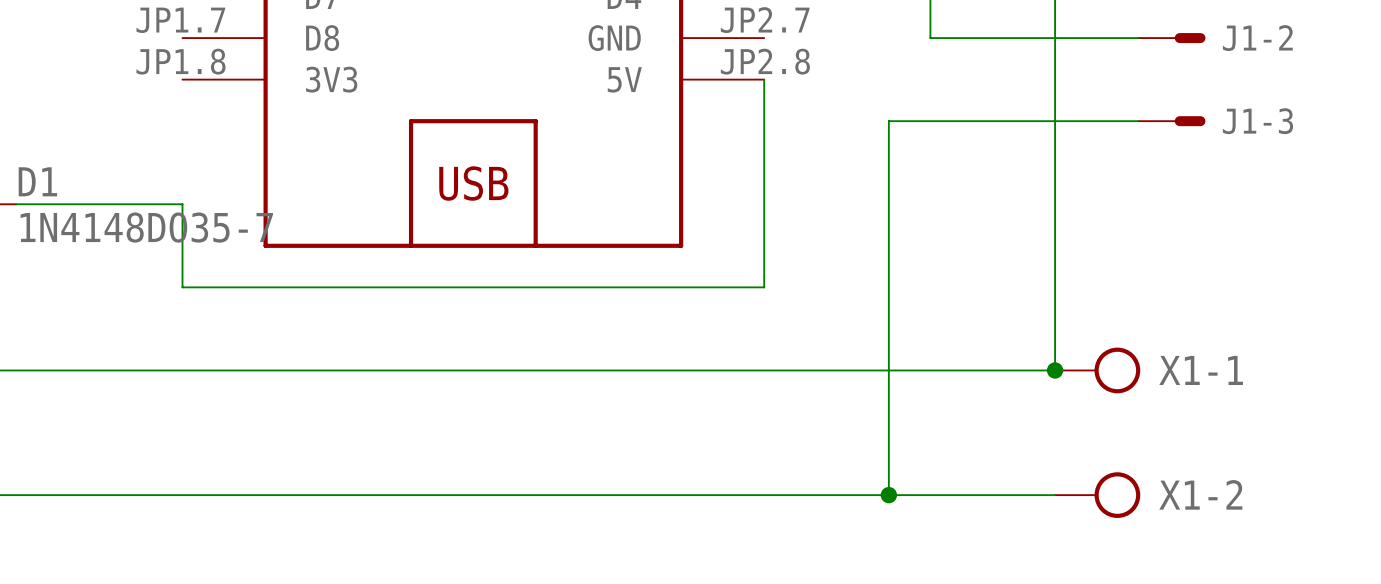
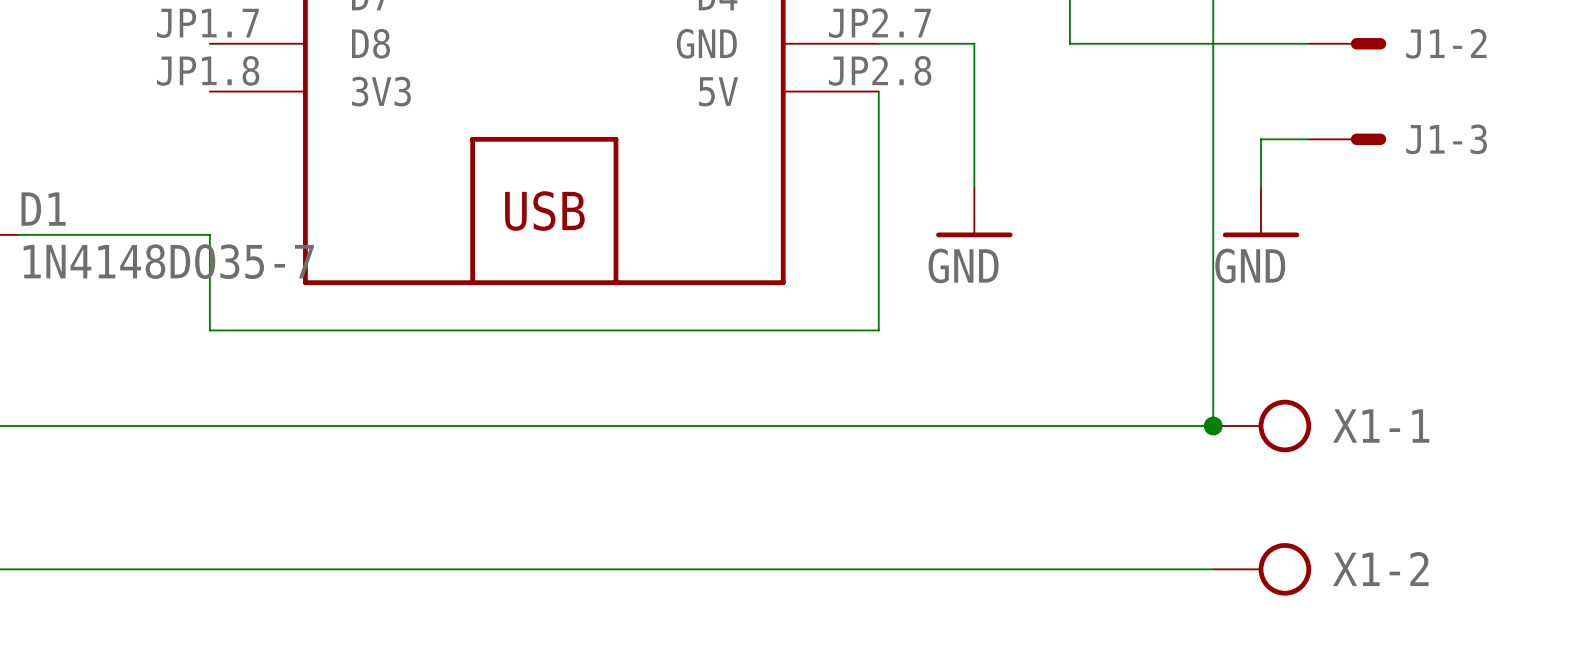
wire: none -> (878, 43) (974, 43) (974, 187)
wire: (1096, 121) (888, 121) (888, 495) -> (1261, 139) (1261, 187)
power symbol: none -> GND (974, 212)
power symbol: none -> GND (1261, 212)
junction: (888, 495) -> none

